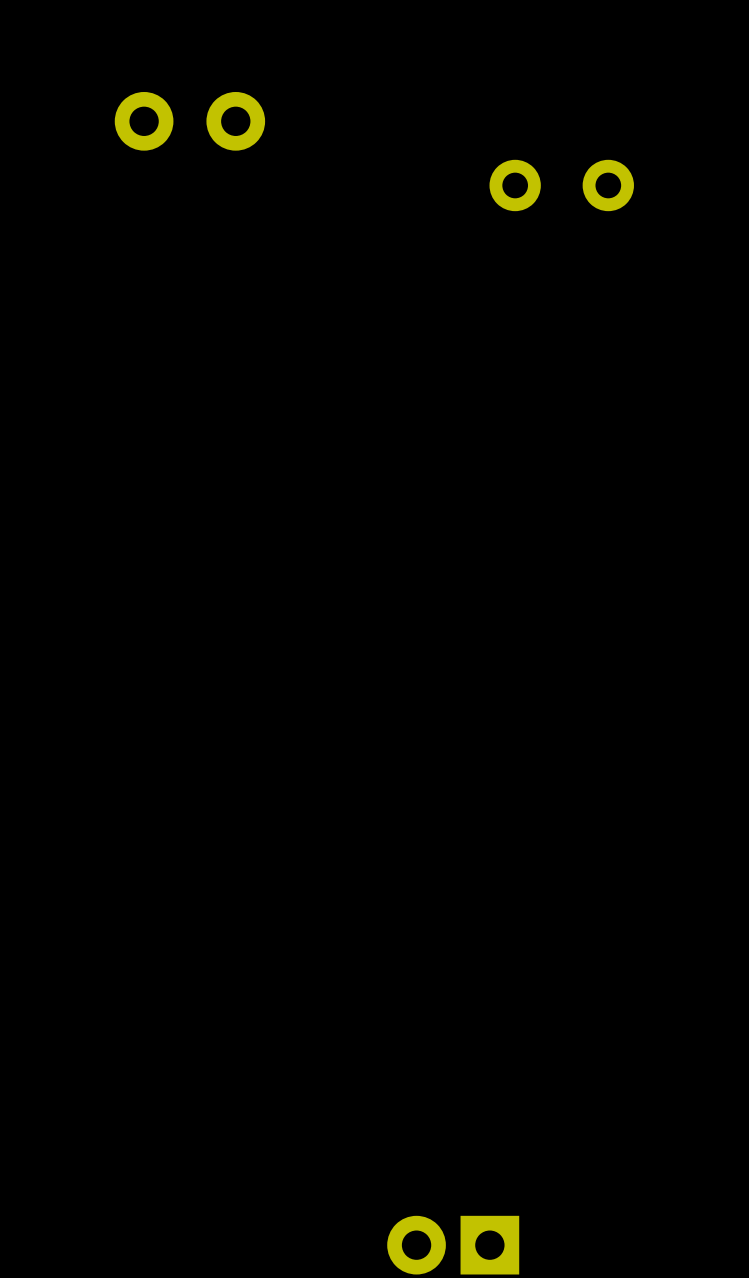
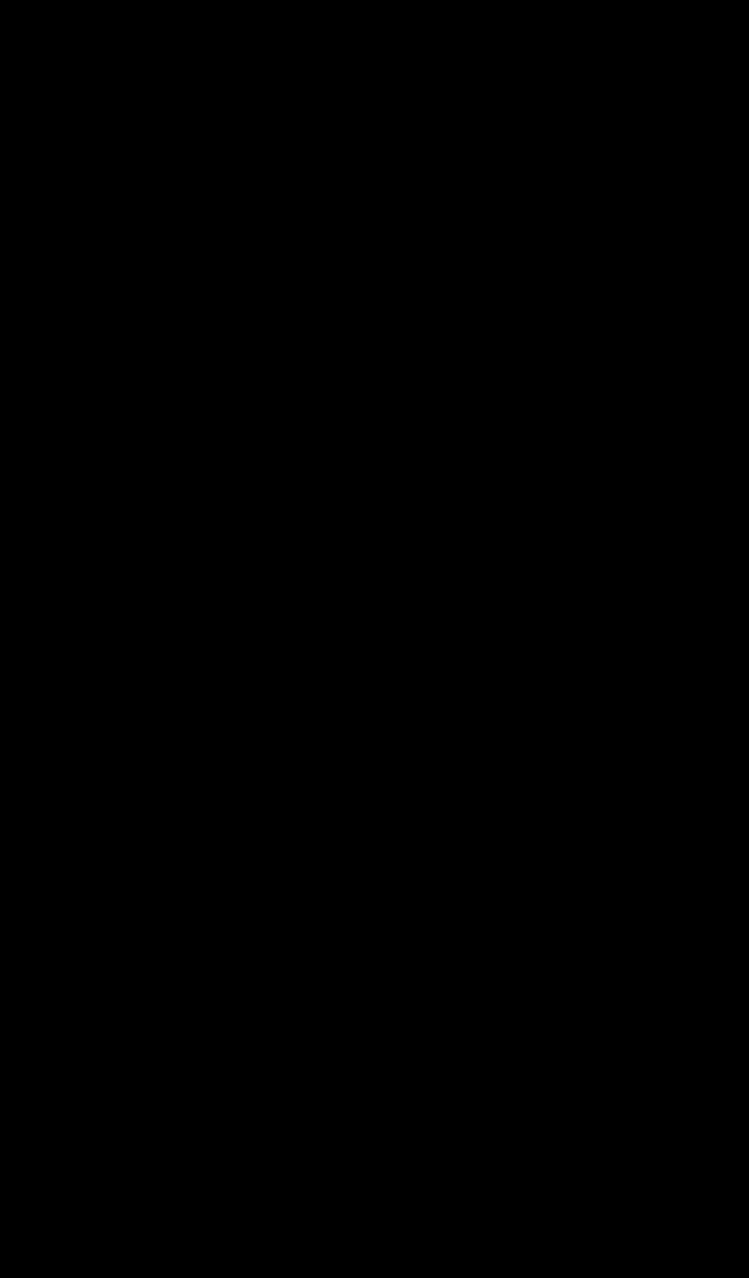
part: (189, 121) -> none
part: (561, 185) -> none
part: (453, 1245) -> none

